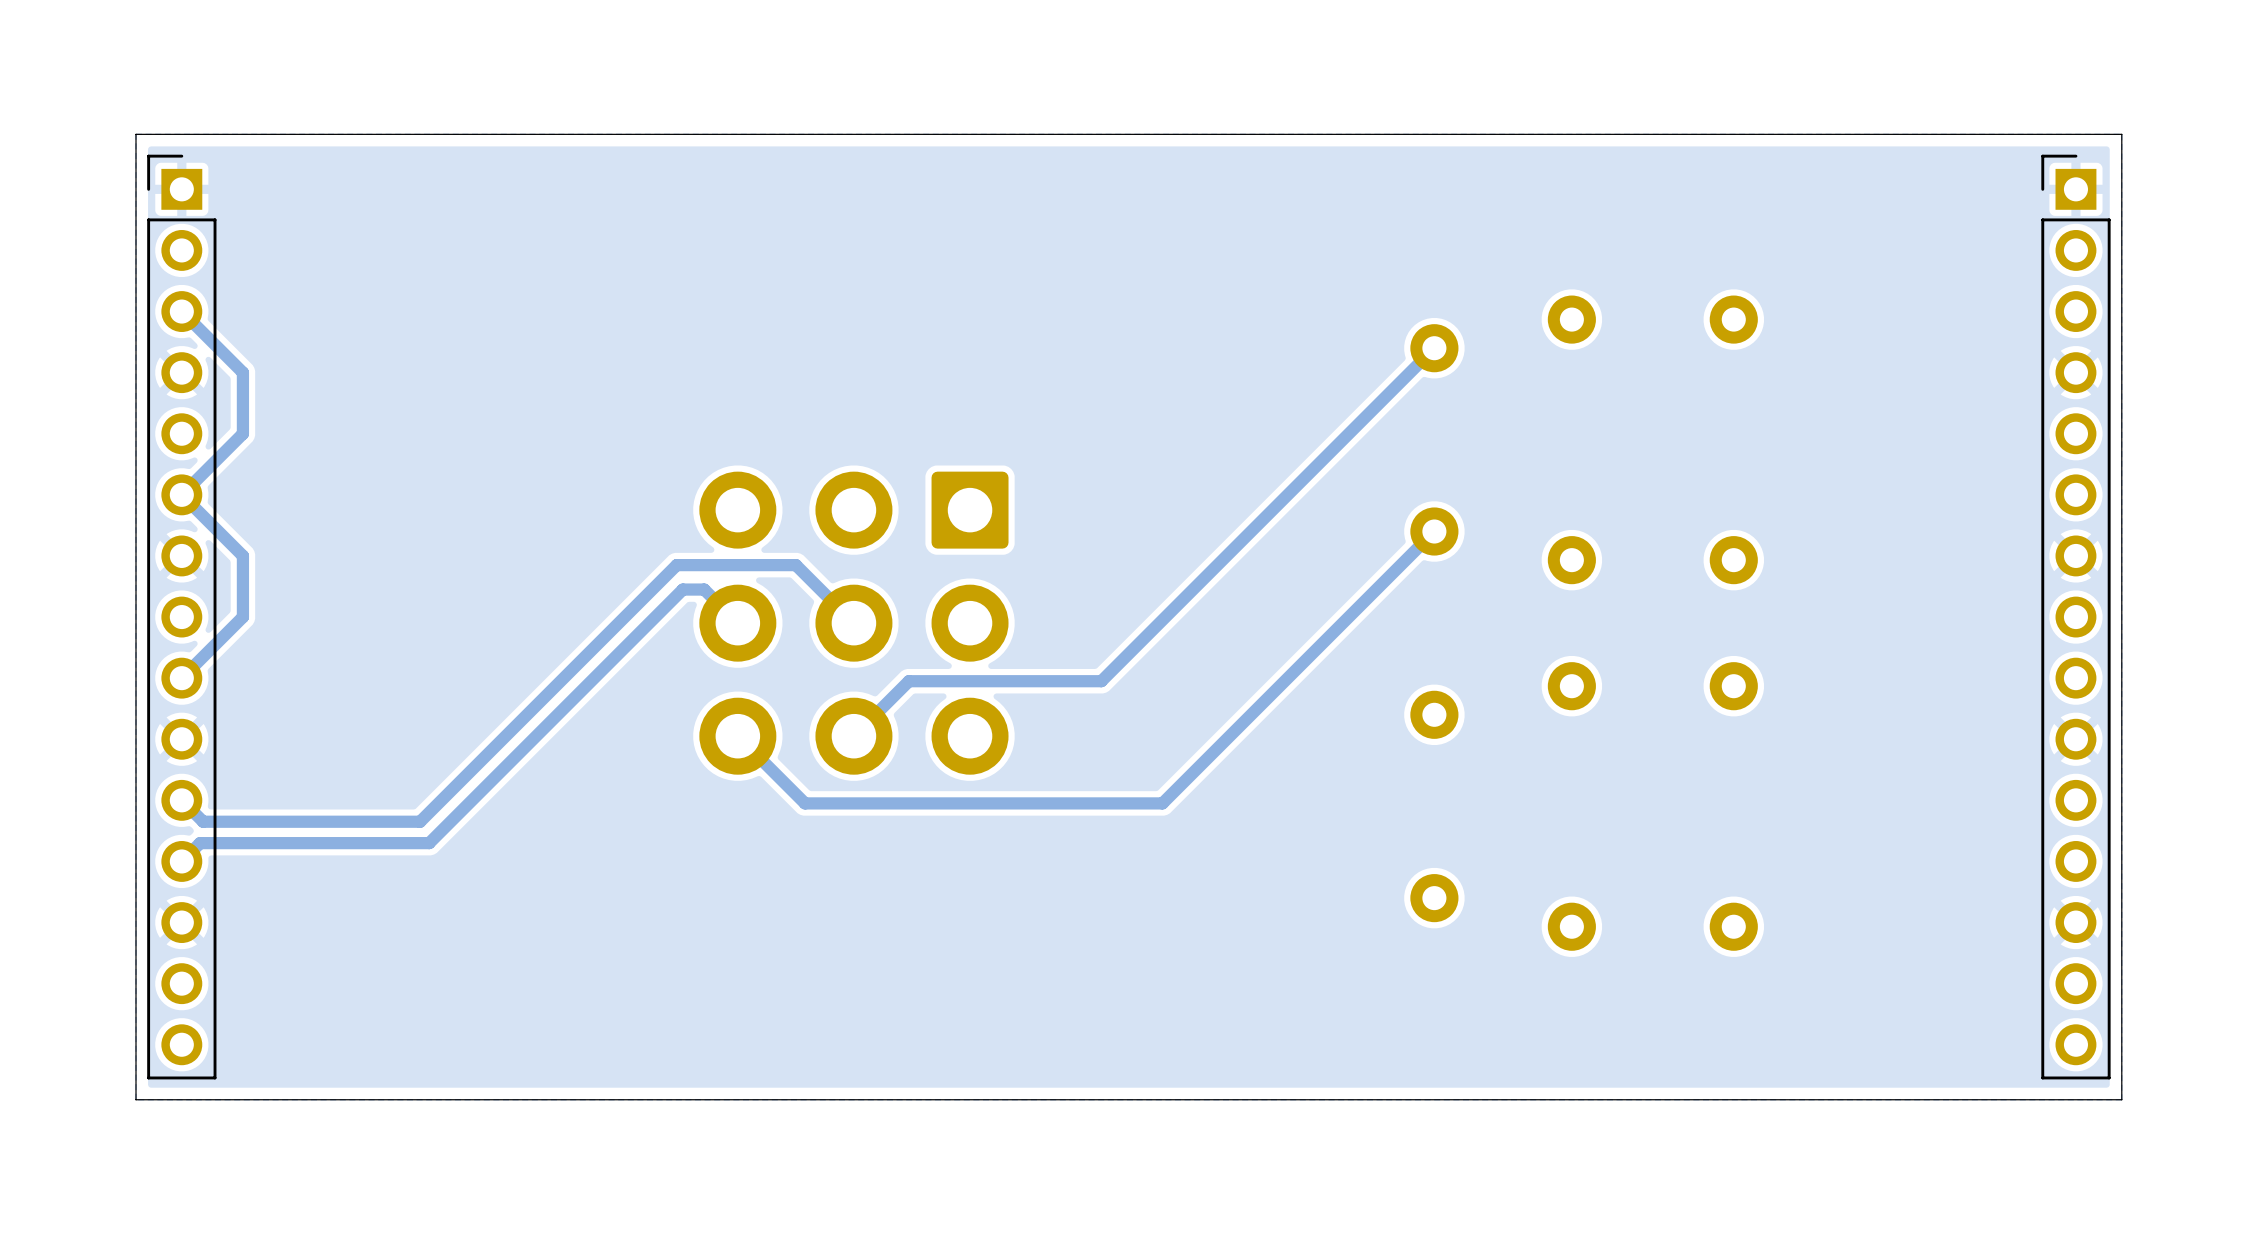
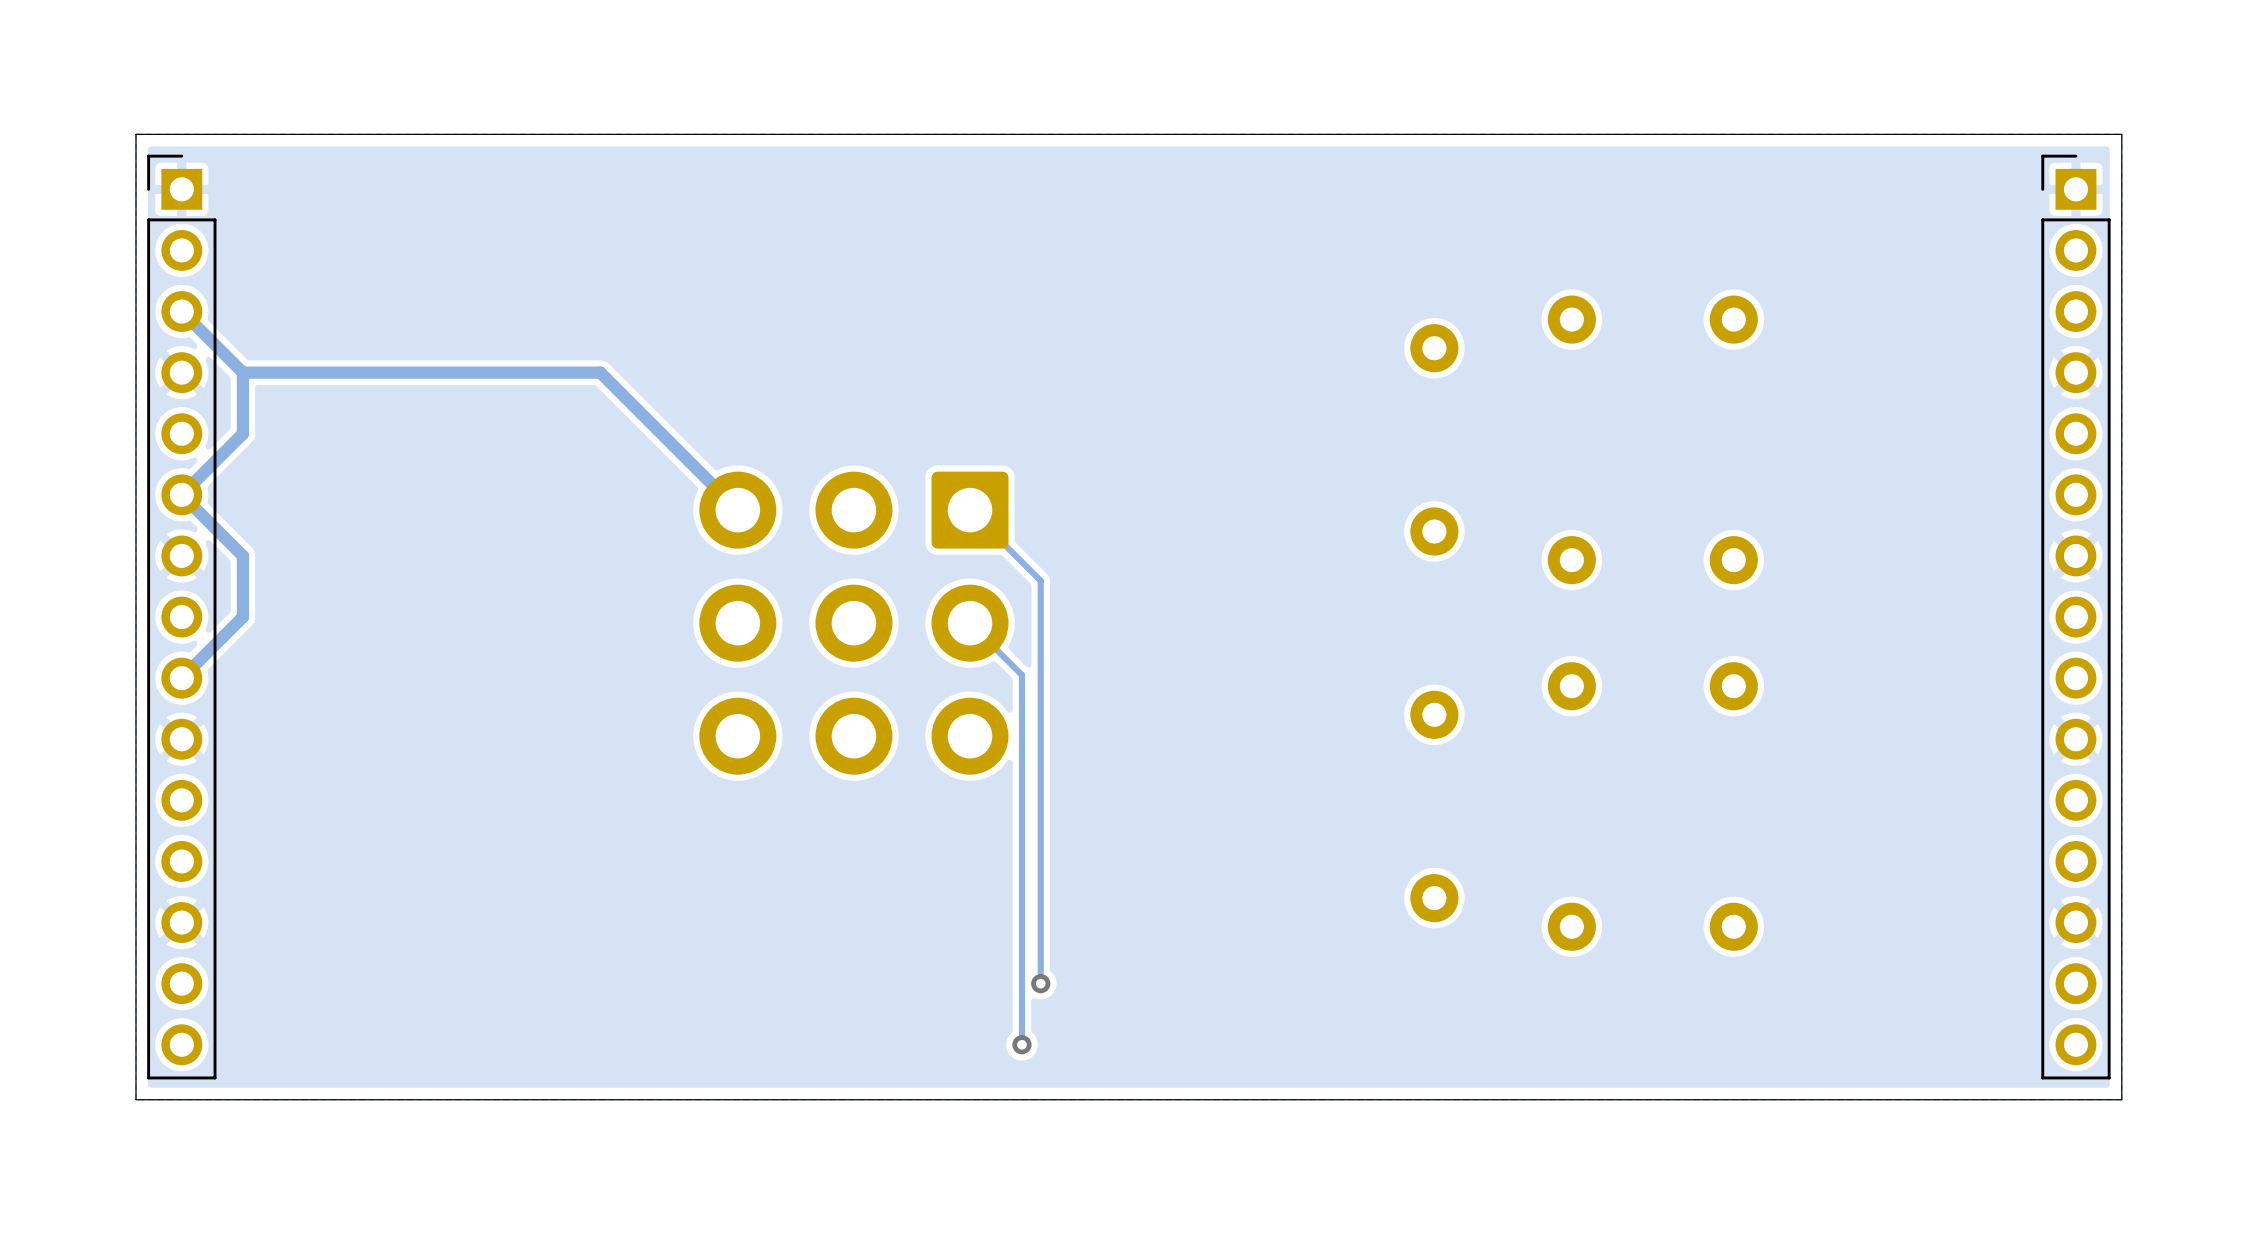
track: (1434, 348) (1101, 681) (908, 681) (853, 736) -> none
track: none -> (242, 372) (600, 372) (737, 510)
track: none -> (970, 510) (1040, 580) (1040, 983)
track: (1434, 531) (1162, 803) (805, 803) (737, 736) -> none
track: (737, 623) (704, 589) (682, 589) (429, 843) (200, 843) (181, 861) -> none
track: (853, 623) (795, 565) (676, 565) (420, 821) (203, 821) (181, 800) -> none
track: none -> (970, 623) (1021, 675) (1021, 1044)
via: none -> (1040, 983)
via: none -> (1021, 1044)

